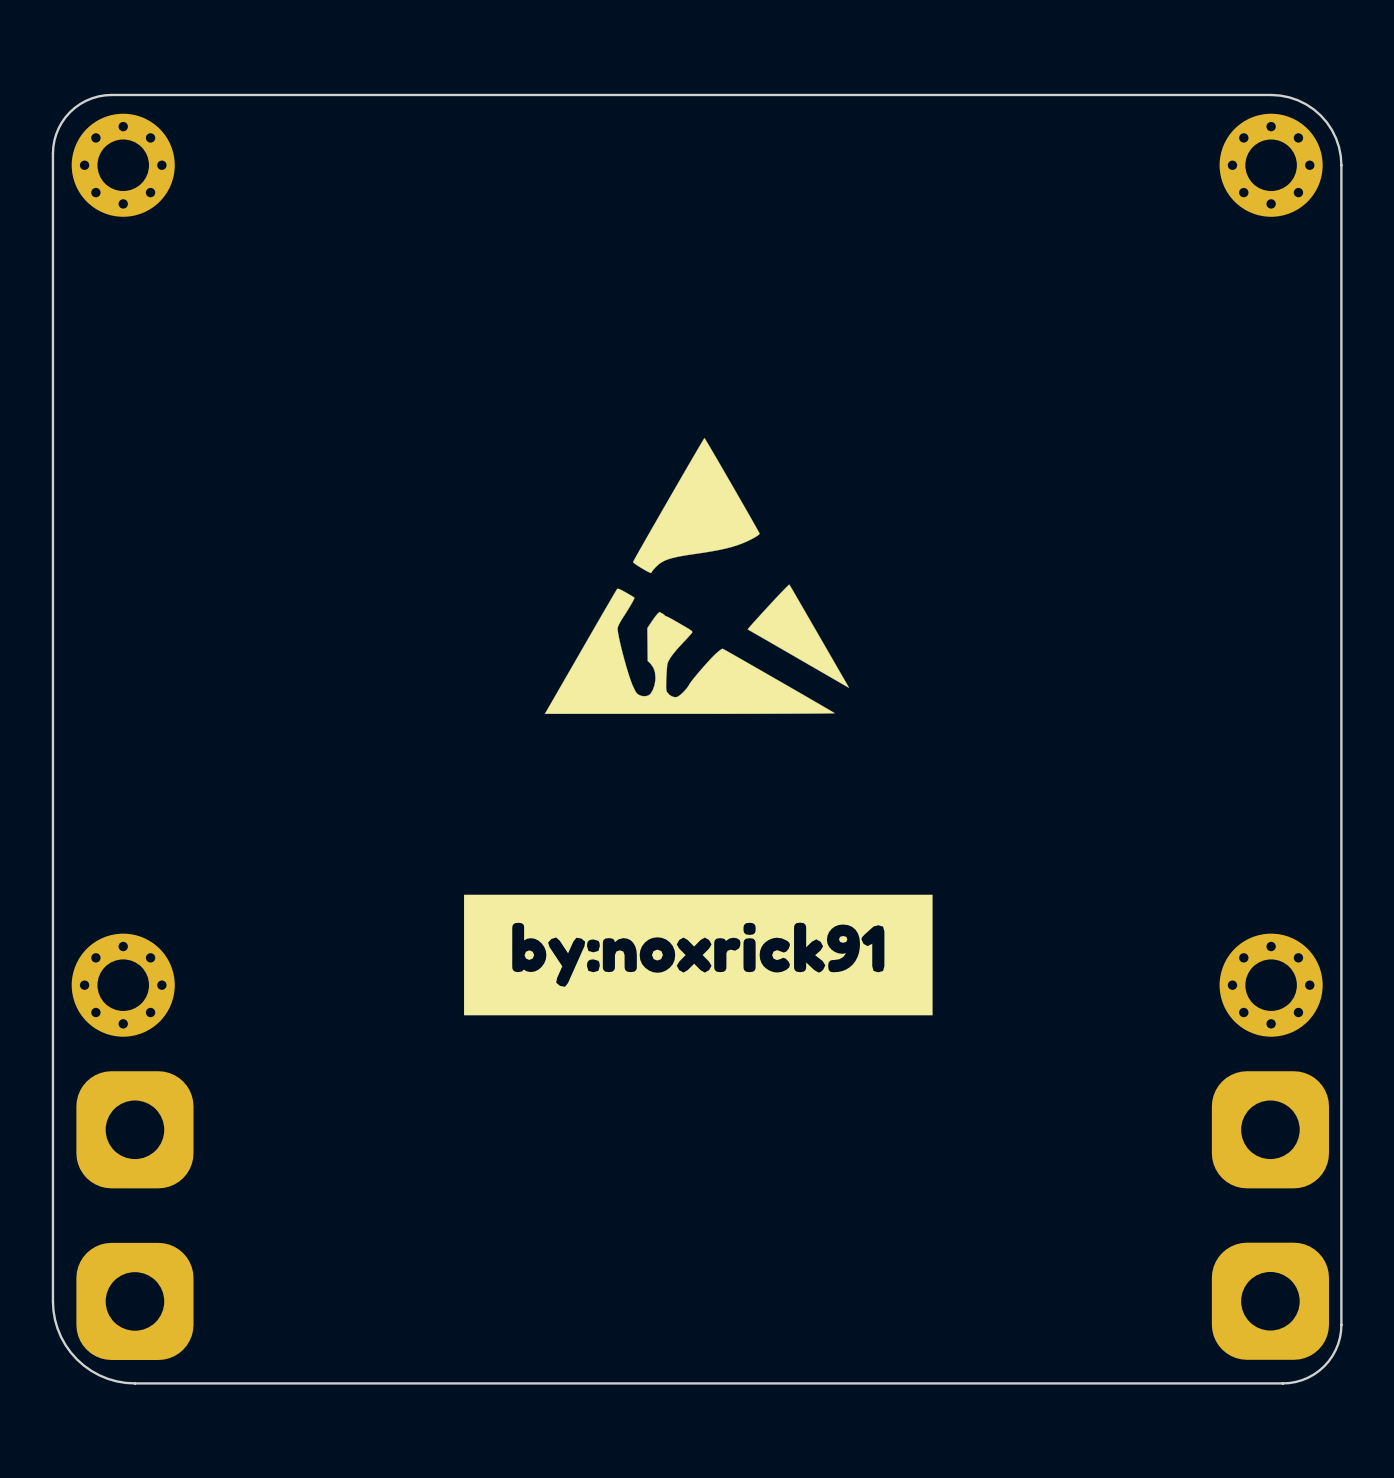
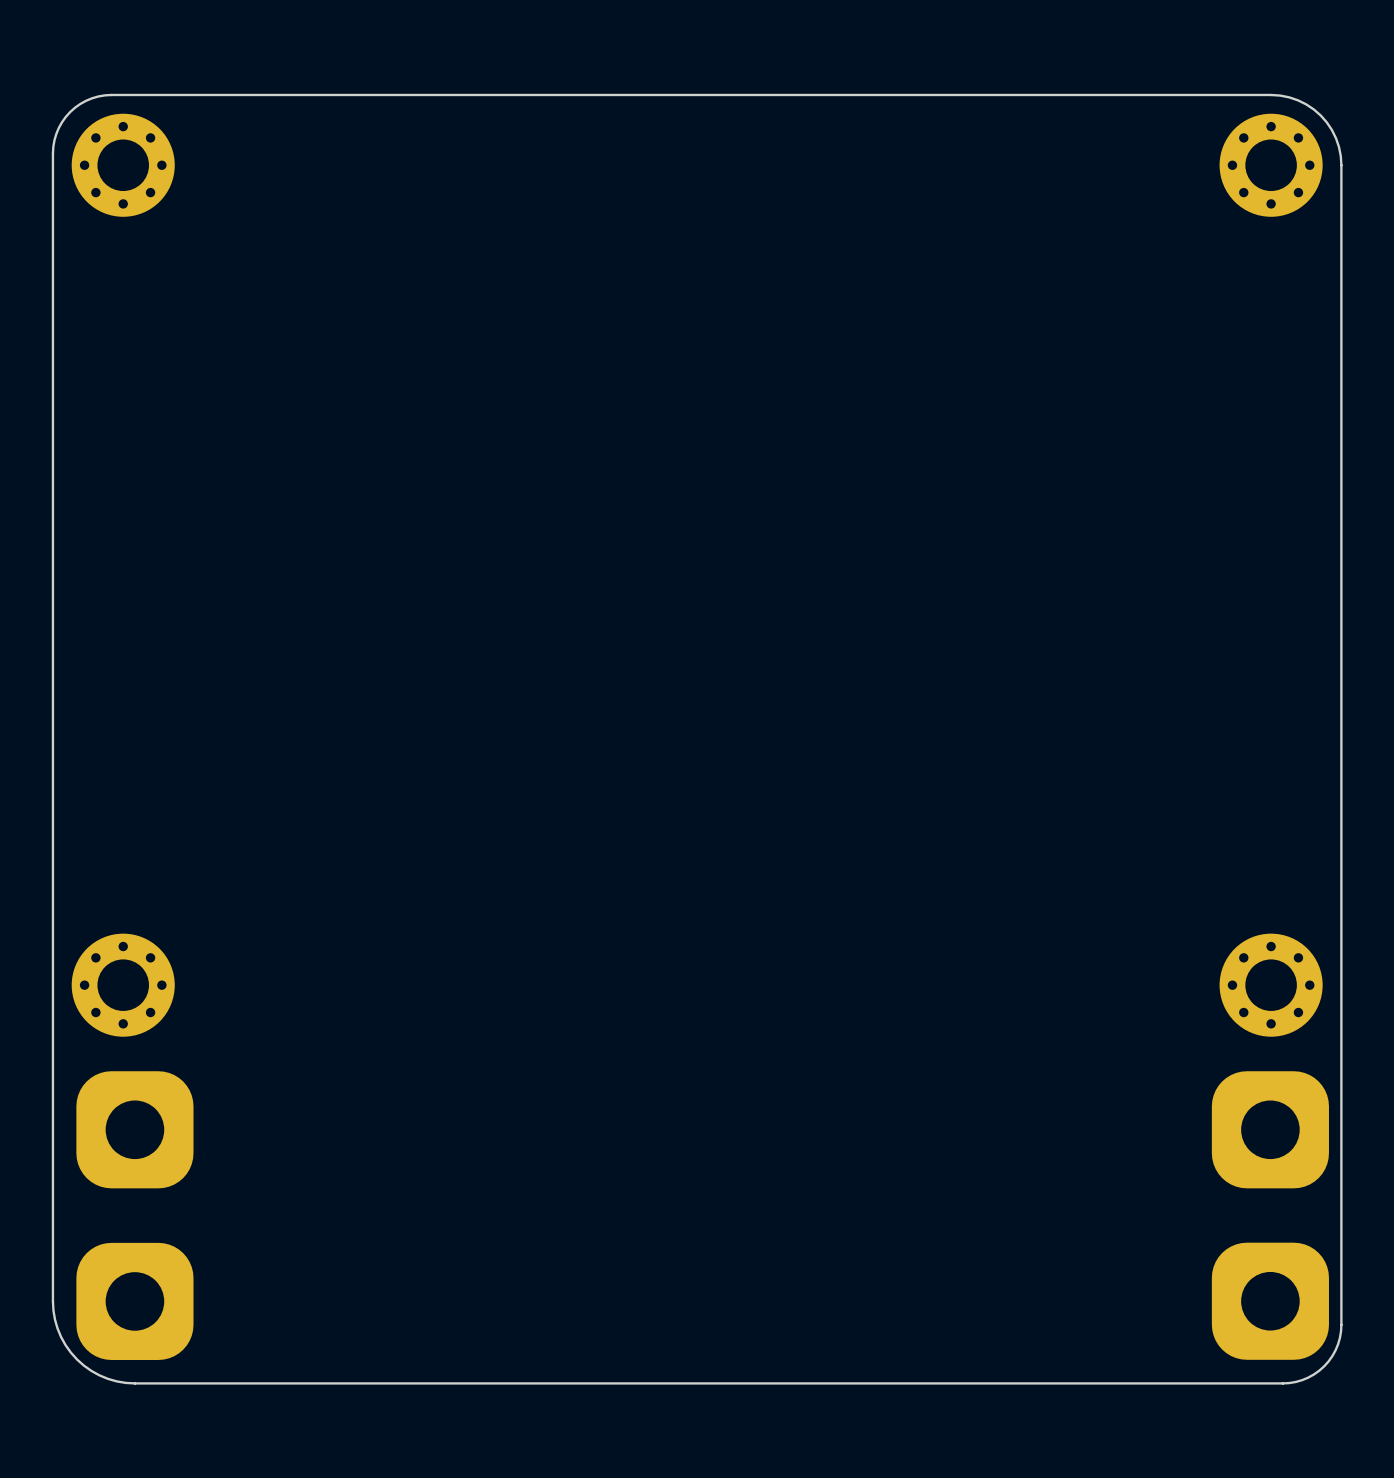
drawing: [544, 437, 849, 714] -> none
drawing: [464, 894, 933, 1016] -> none

